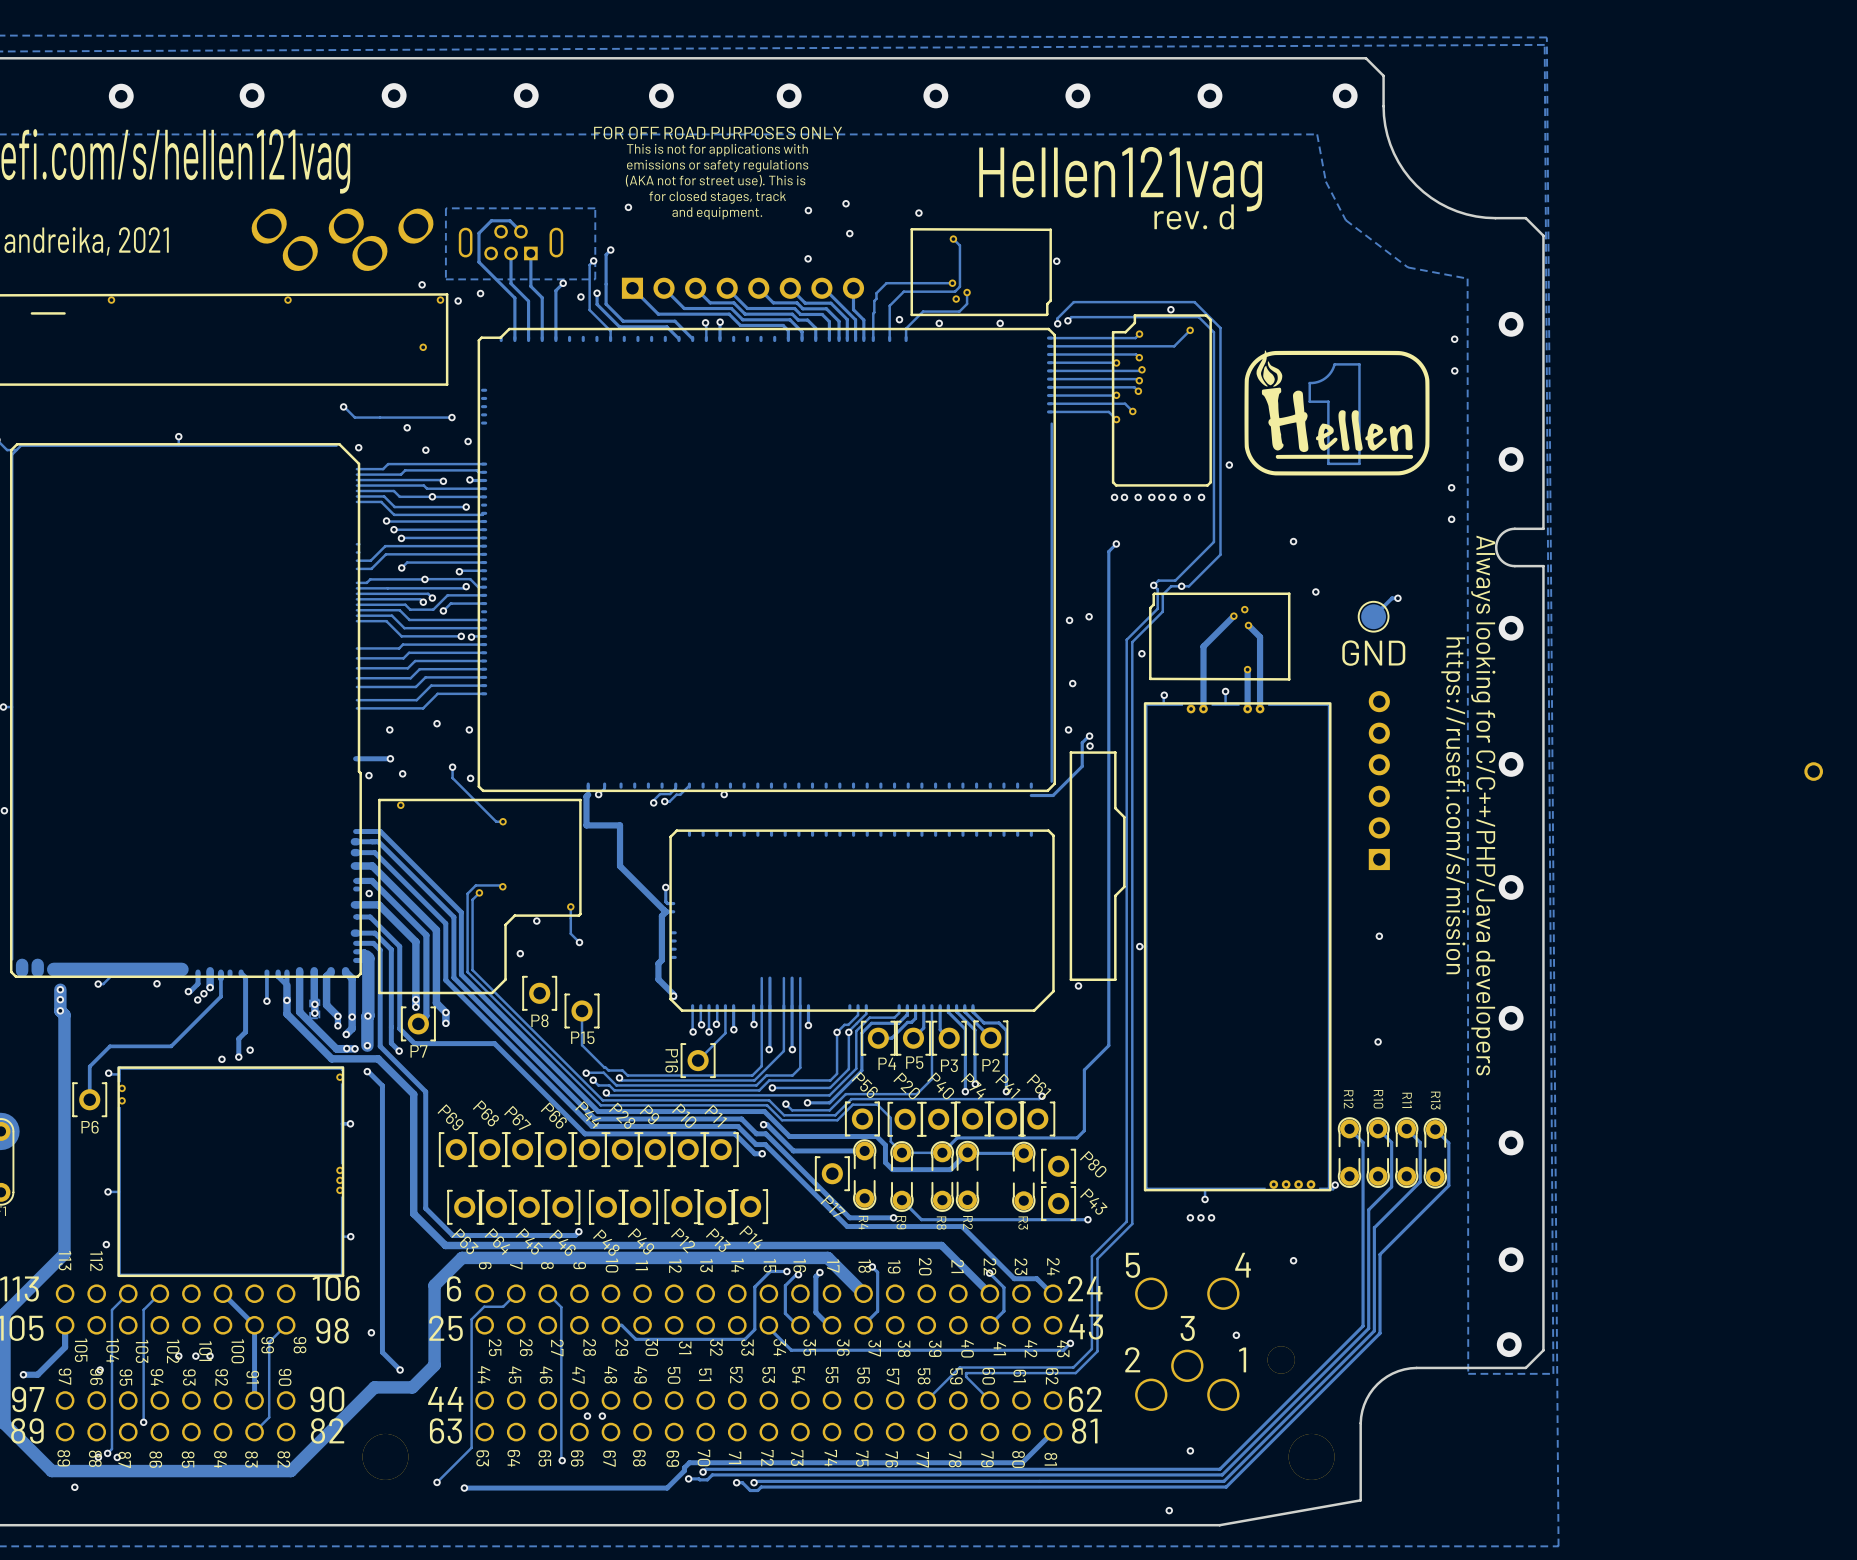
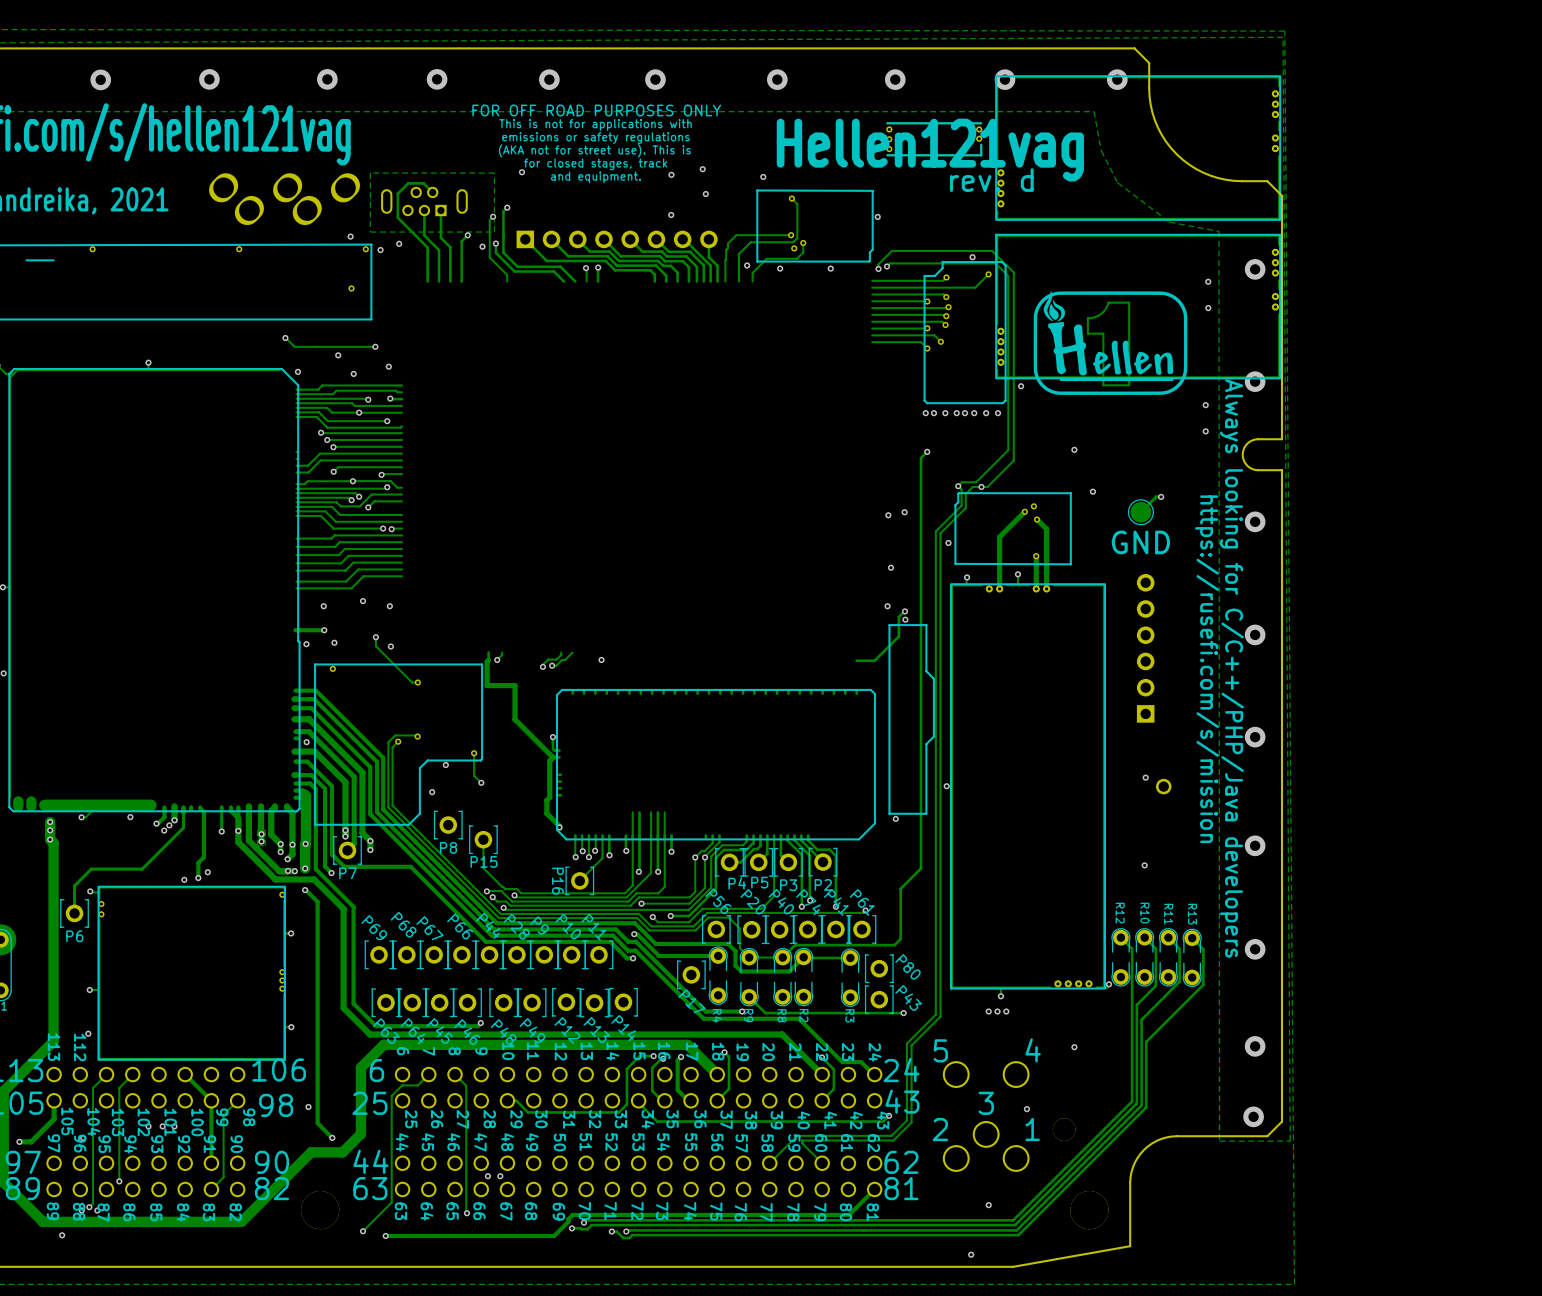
part: none -> (934, 139)
part: none -> (1138, 148)
part: none -> (1138, 306)
part: (766, 559) -> none
part: (1813, 771) -> none
part: none -> (1163, 786)

